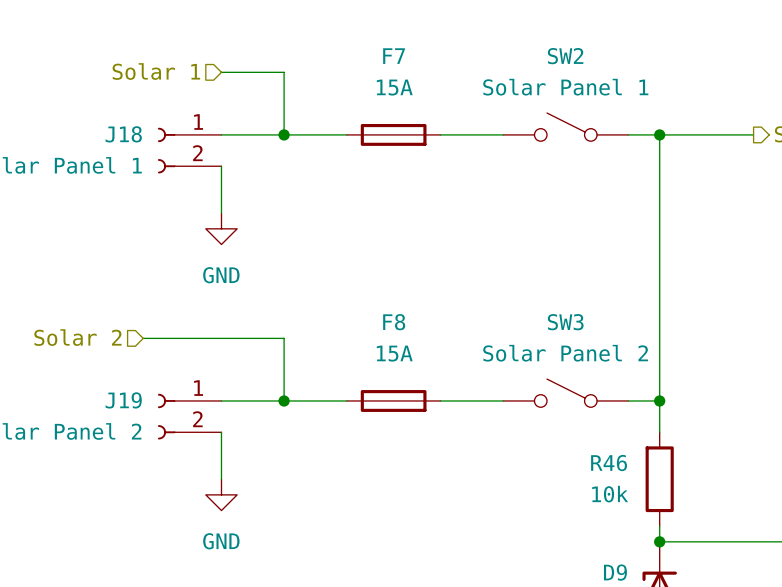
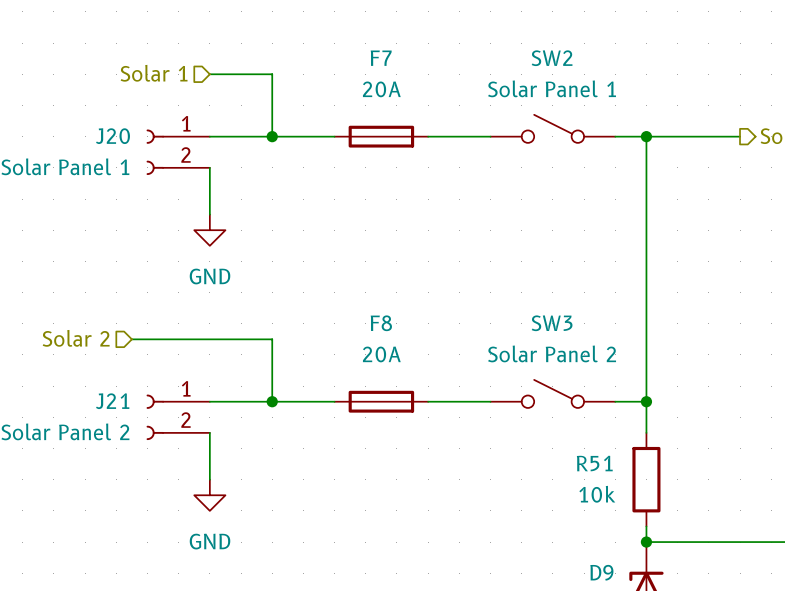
F7 value: 15A (394, 87) -> 20A (381, 89)
J18 name: J18 (123, 134) -> J20 (112, 136)
F8 value: 15A (394, 353) -> 20A (381, 354)
J19 name: J19 (123, 400) -> J21 (112, 401)
R46 name: R46 (609, 463) -> R51 (594, 463)

